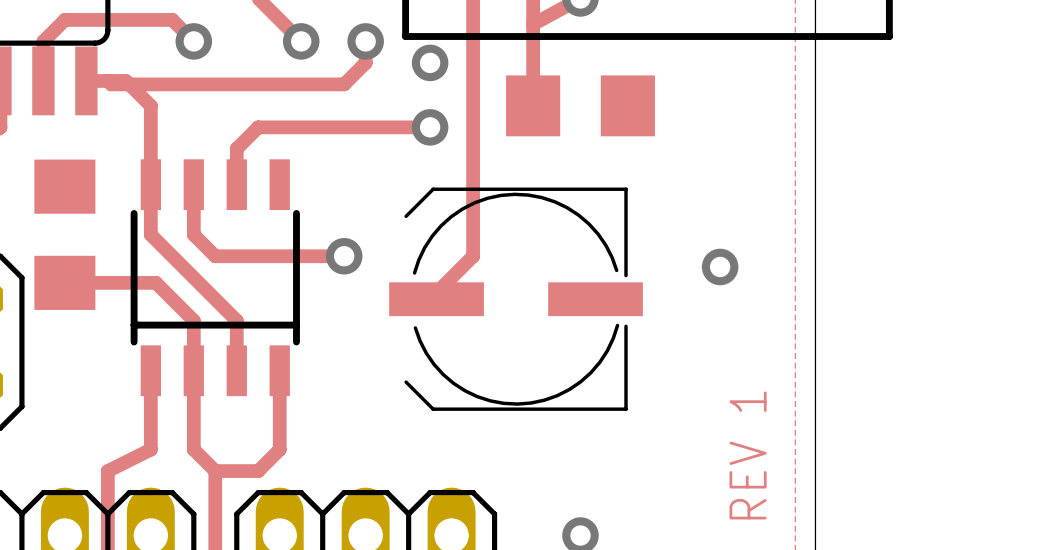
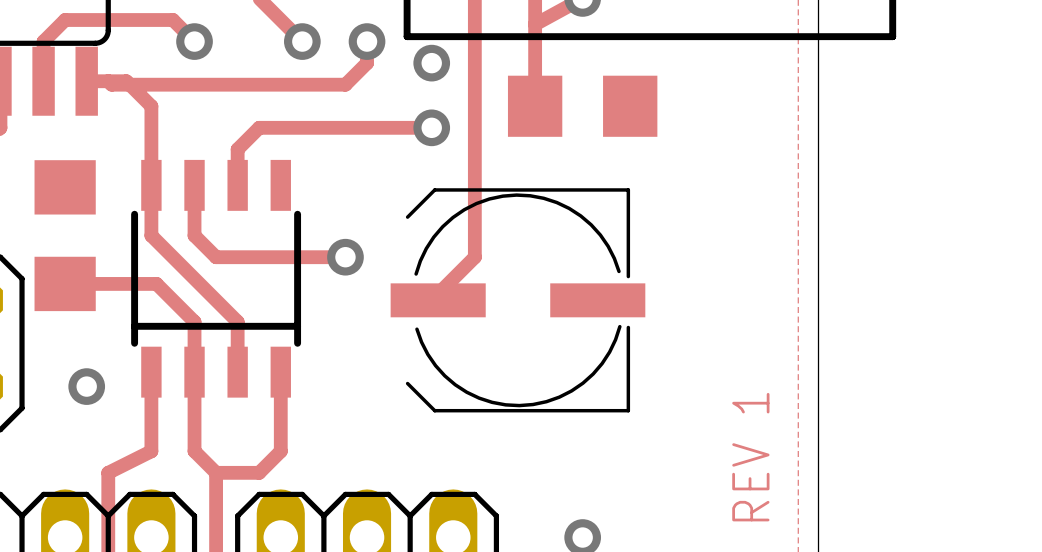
via: (720, 266) -> none
via: none -> (86, 386)

